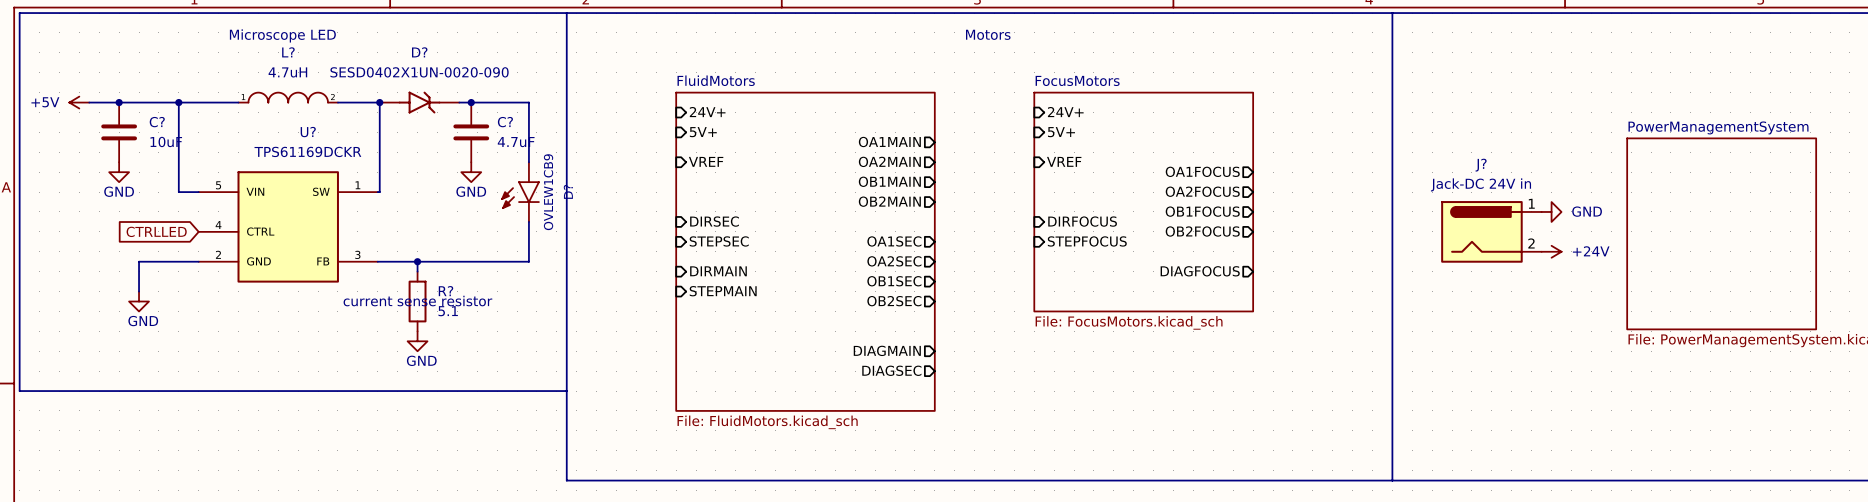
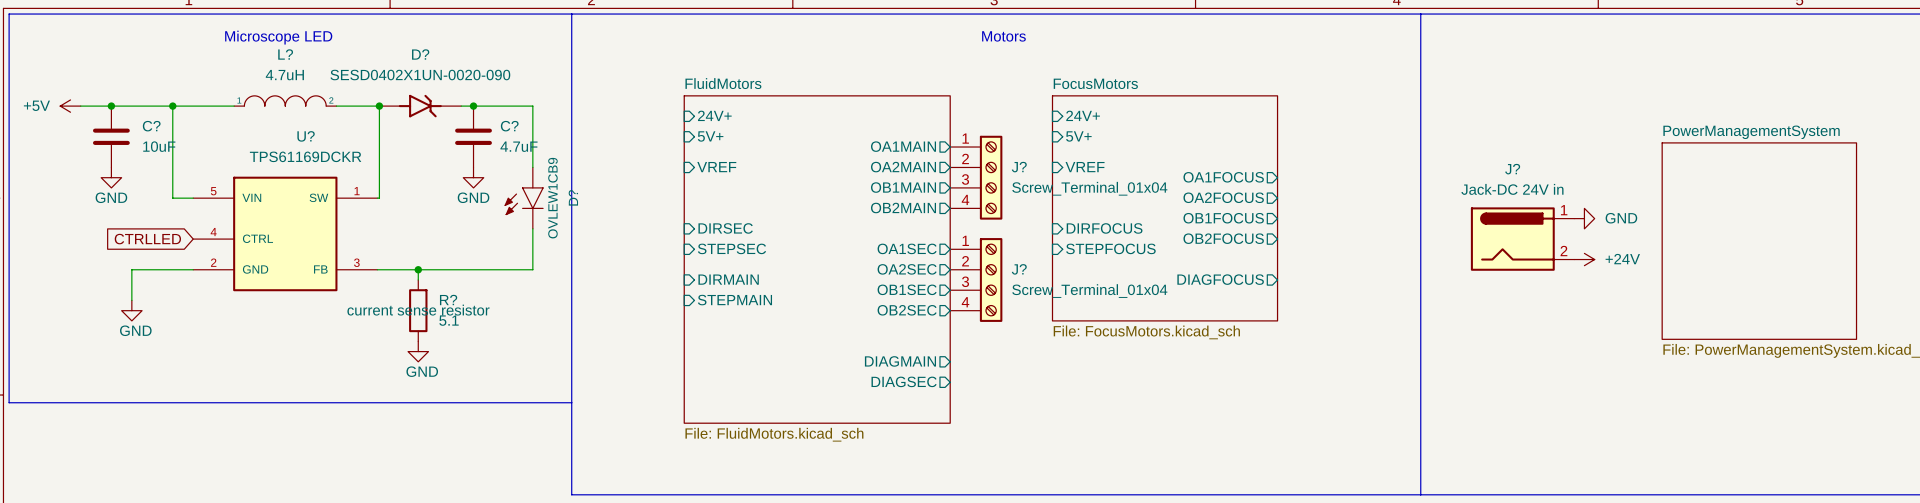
J?: none -> Screw_Terminal_01x04 (976, 177)
J?: none -> Screw_Terminal_01x04 (976, 279)

